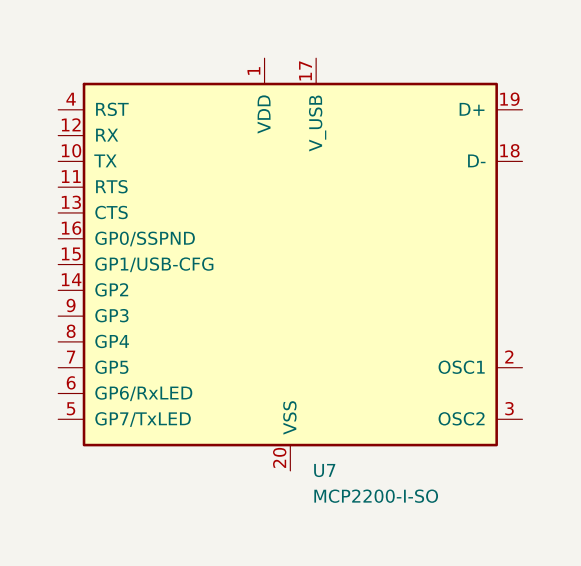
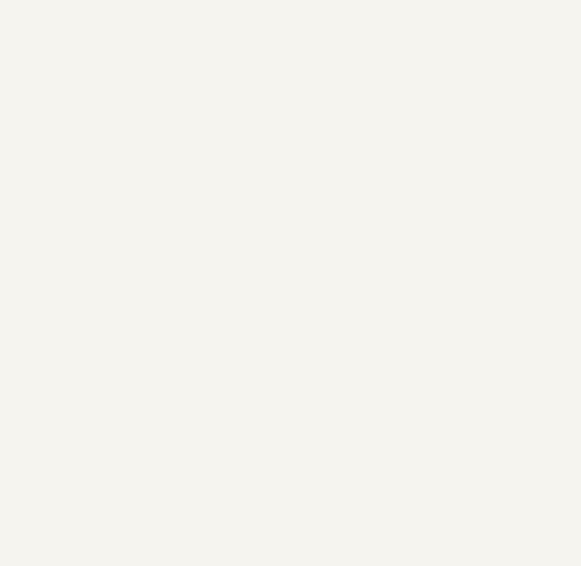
U7: MCP2200-I-SO (290, 264) -> none

